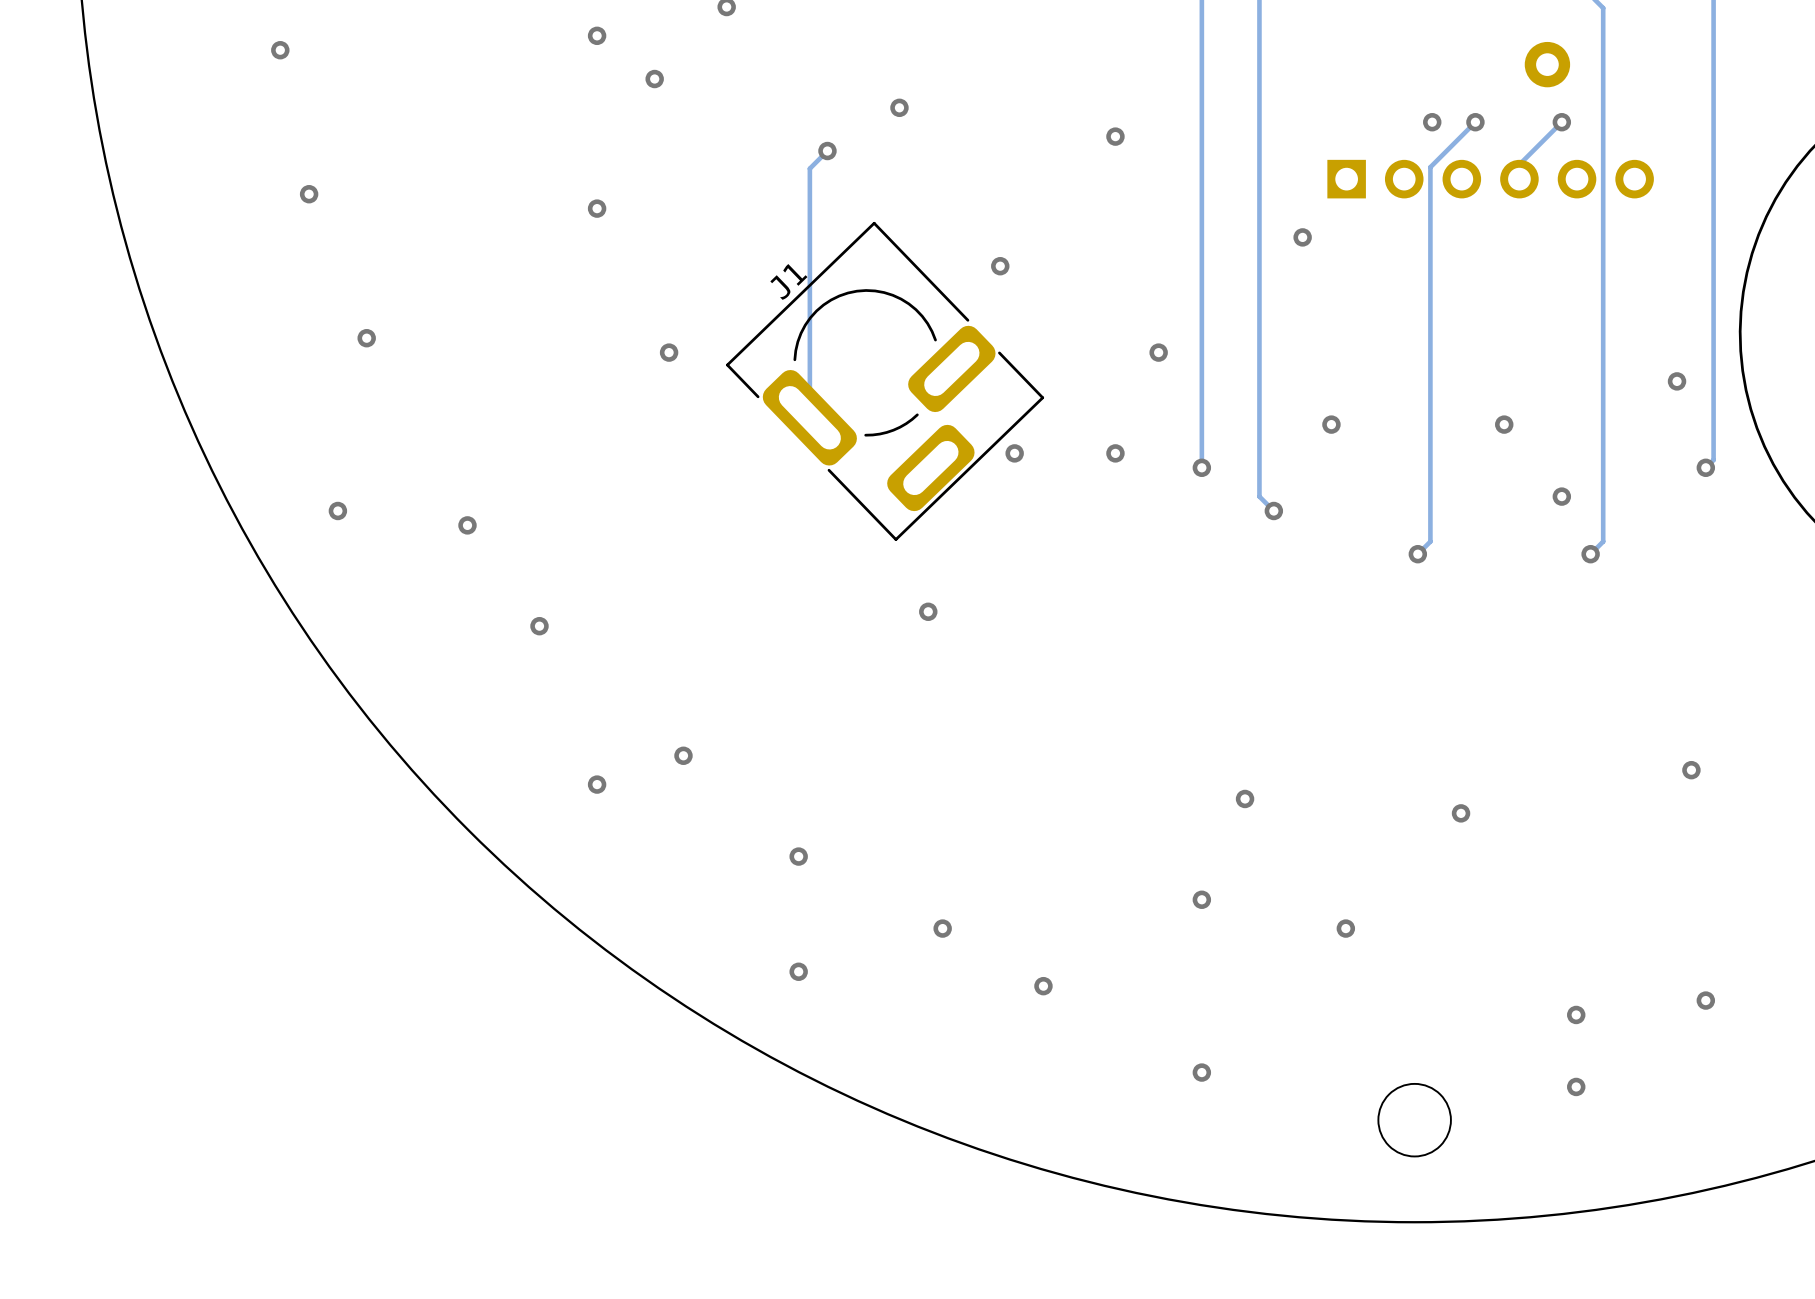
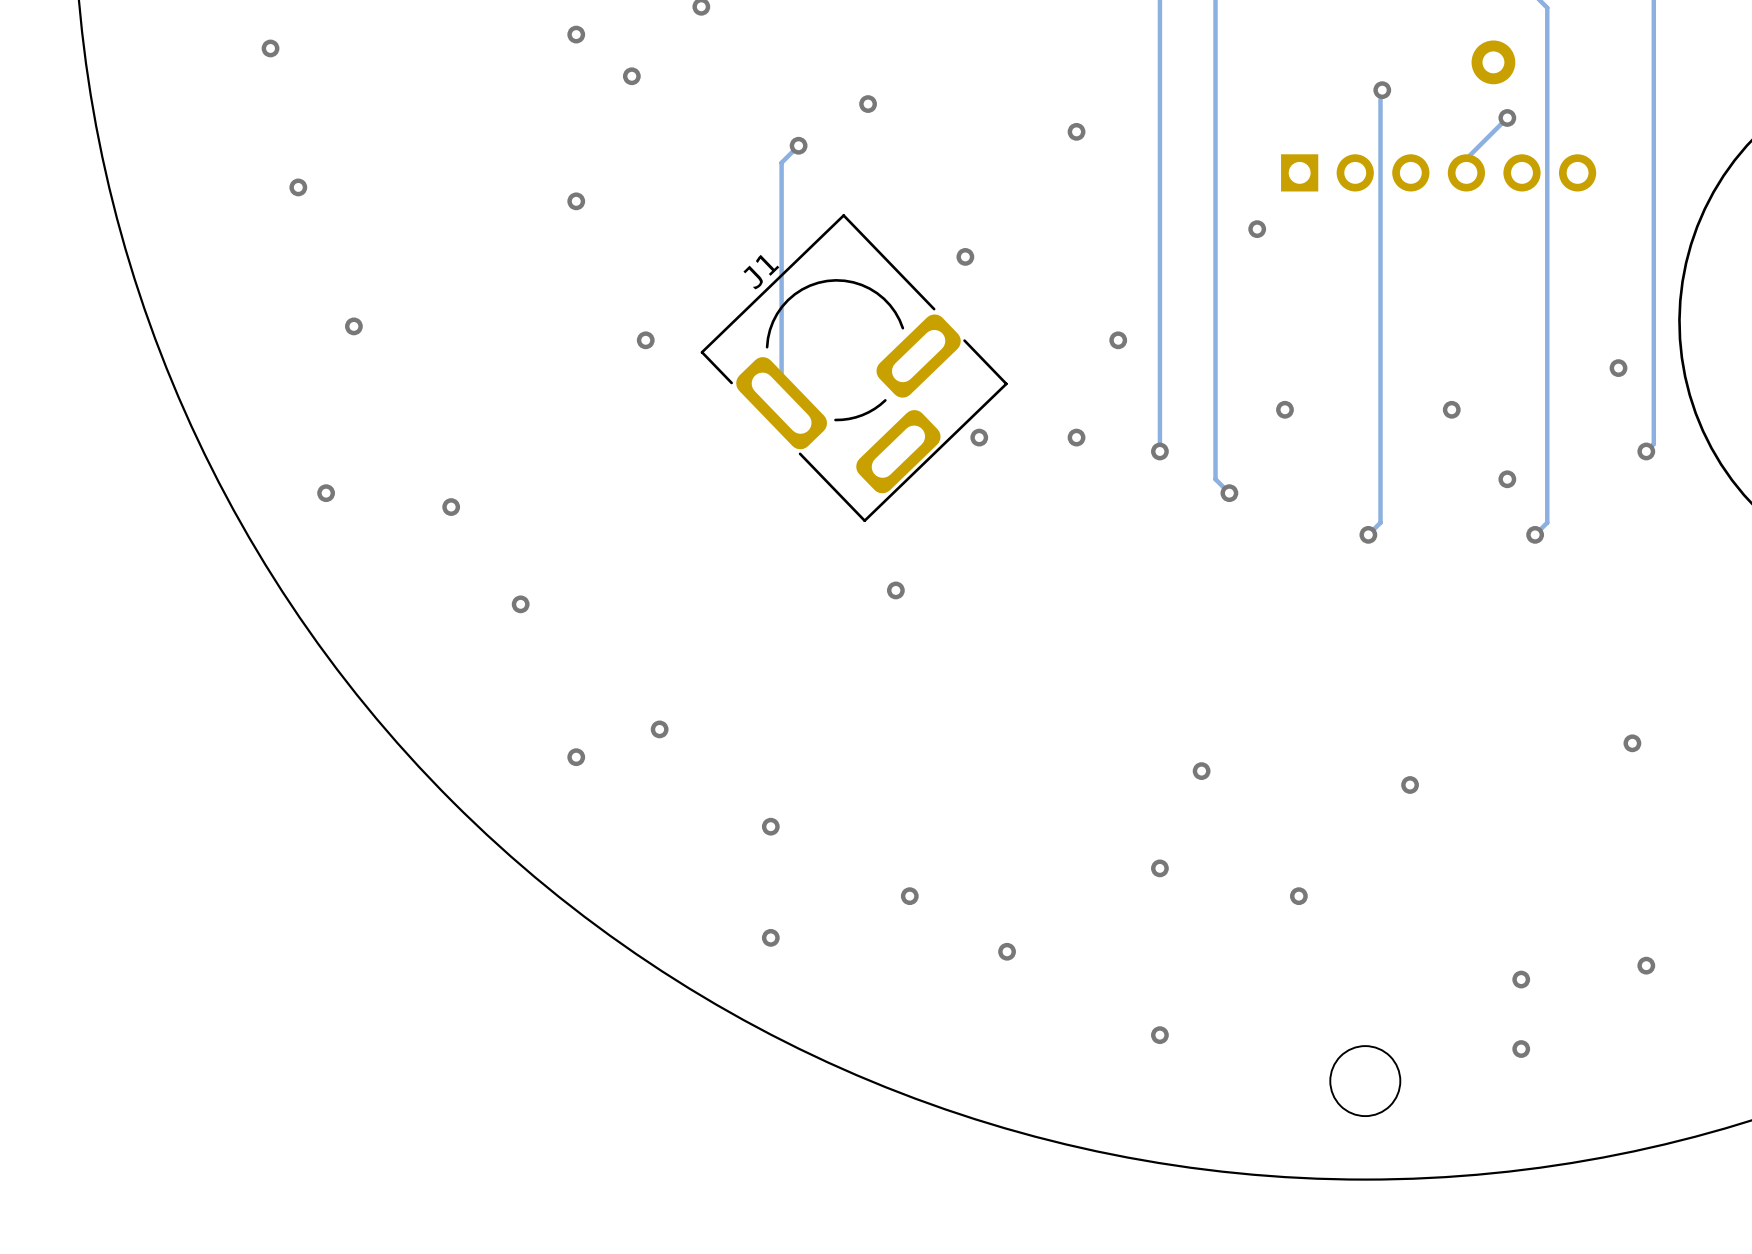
via: none -> (1382, 90)
via: (1432, 122) -> none
track: (1475, 122) (1430, 167) -> (1382, 90) (1380, 91) (1380, 161)
via: (1475, 122) -> none

